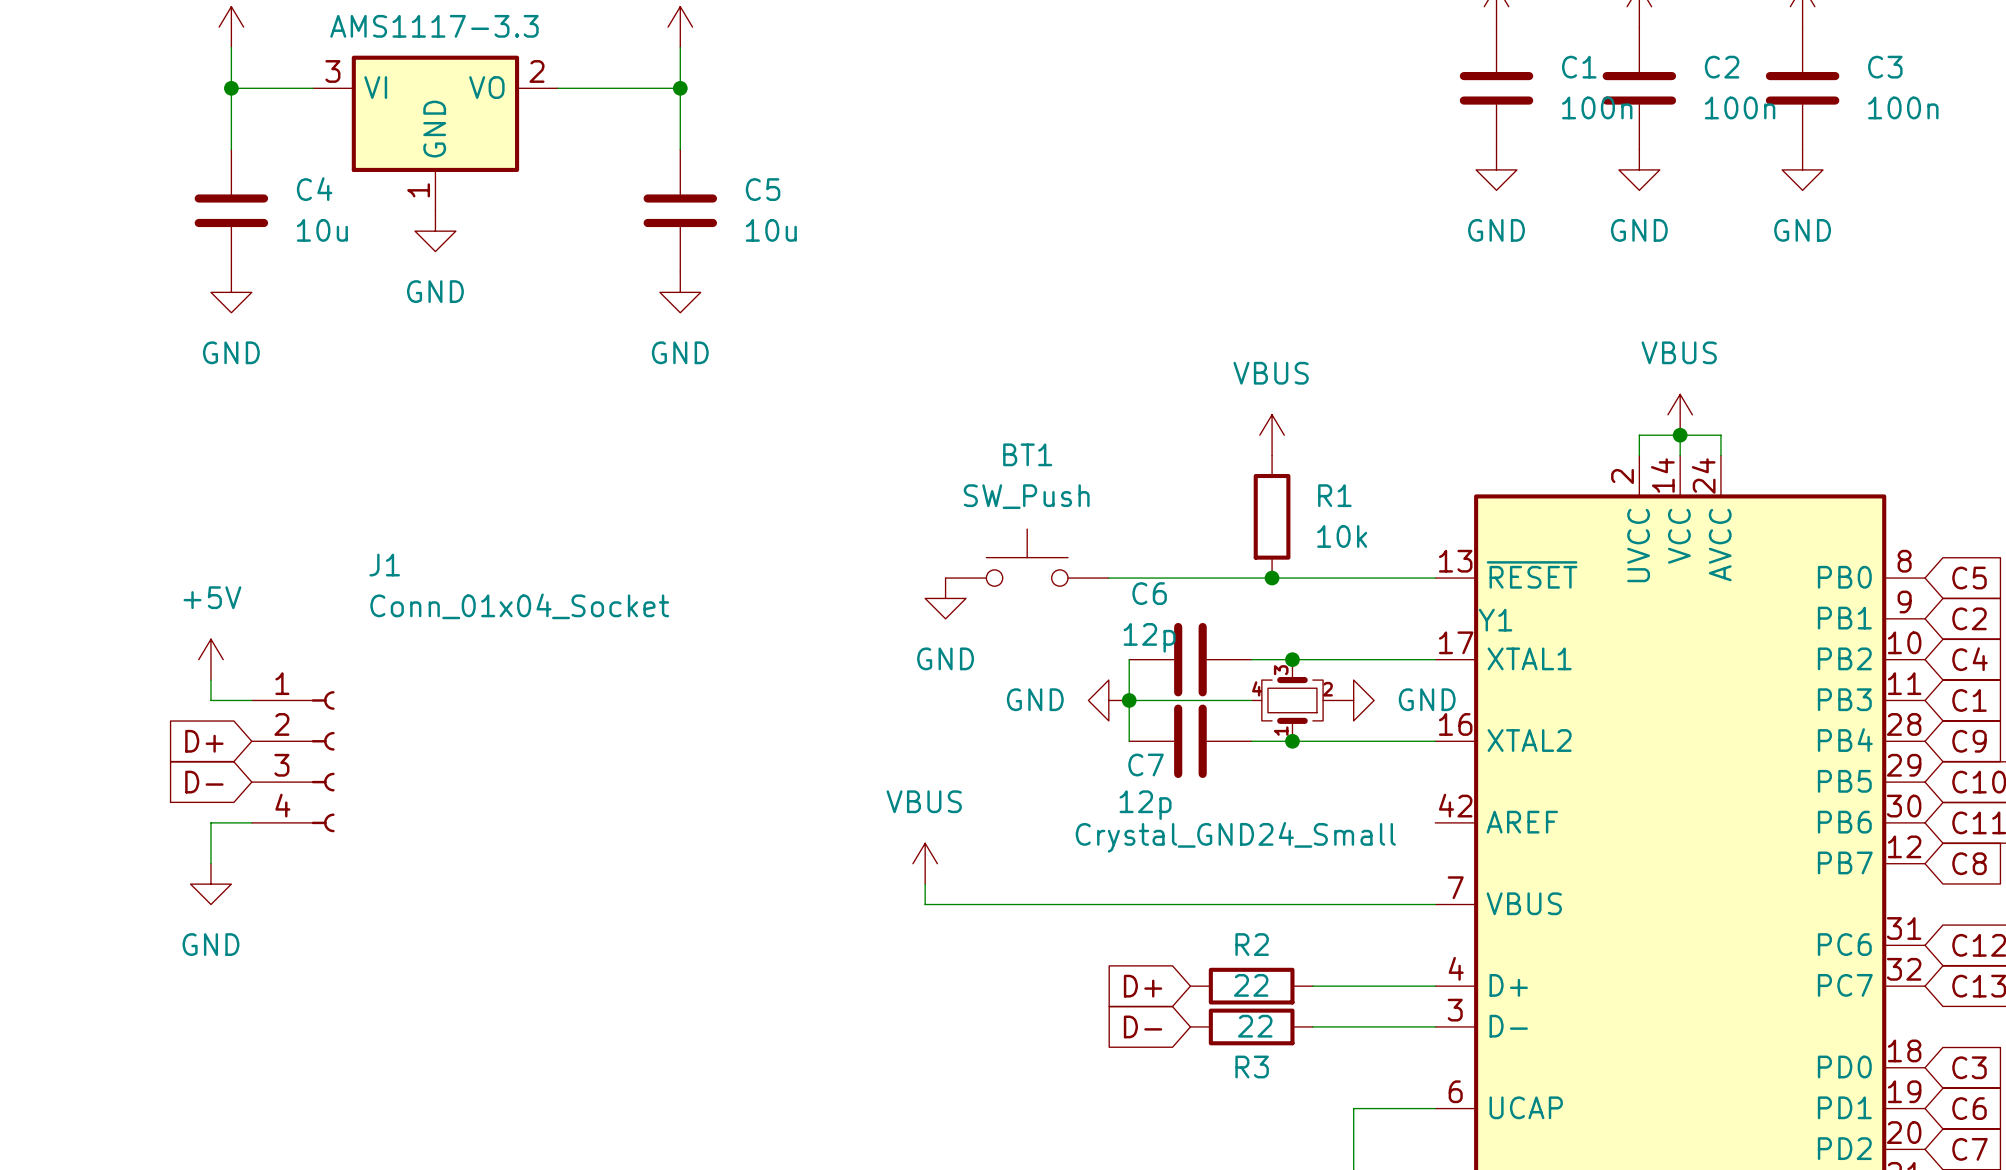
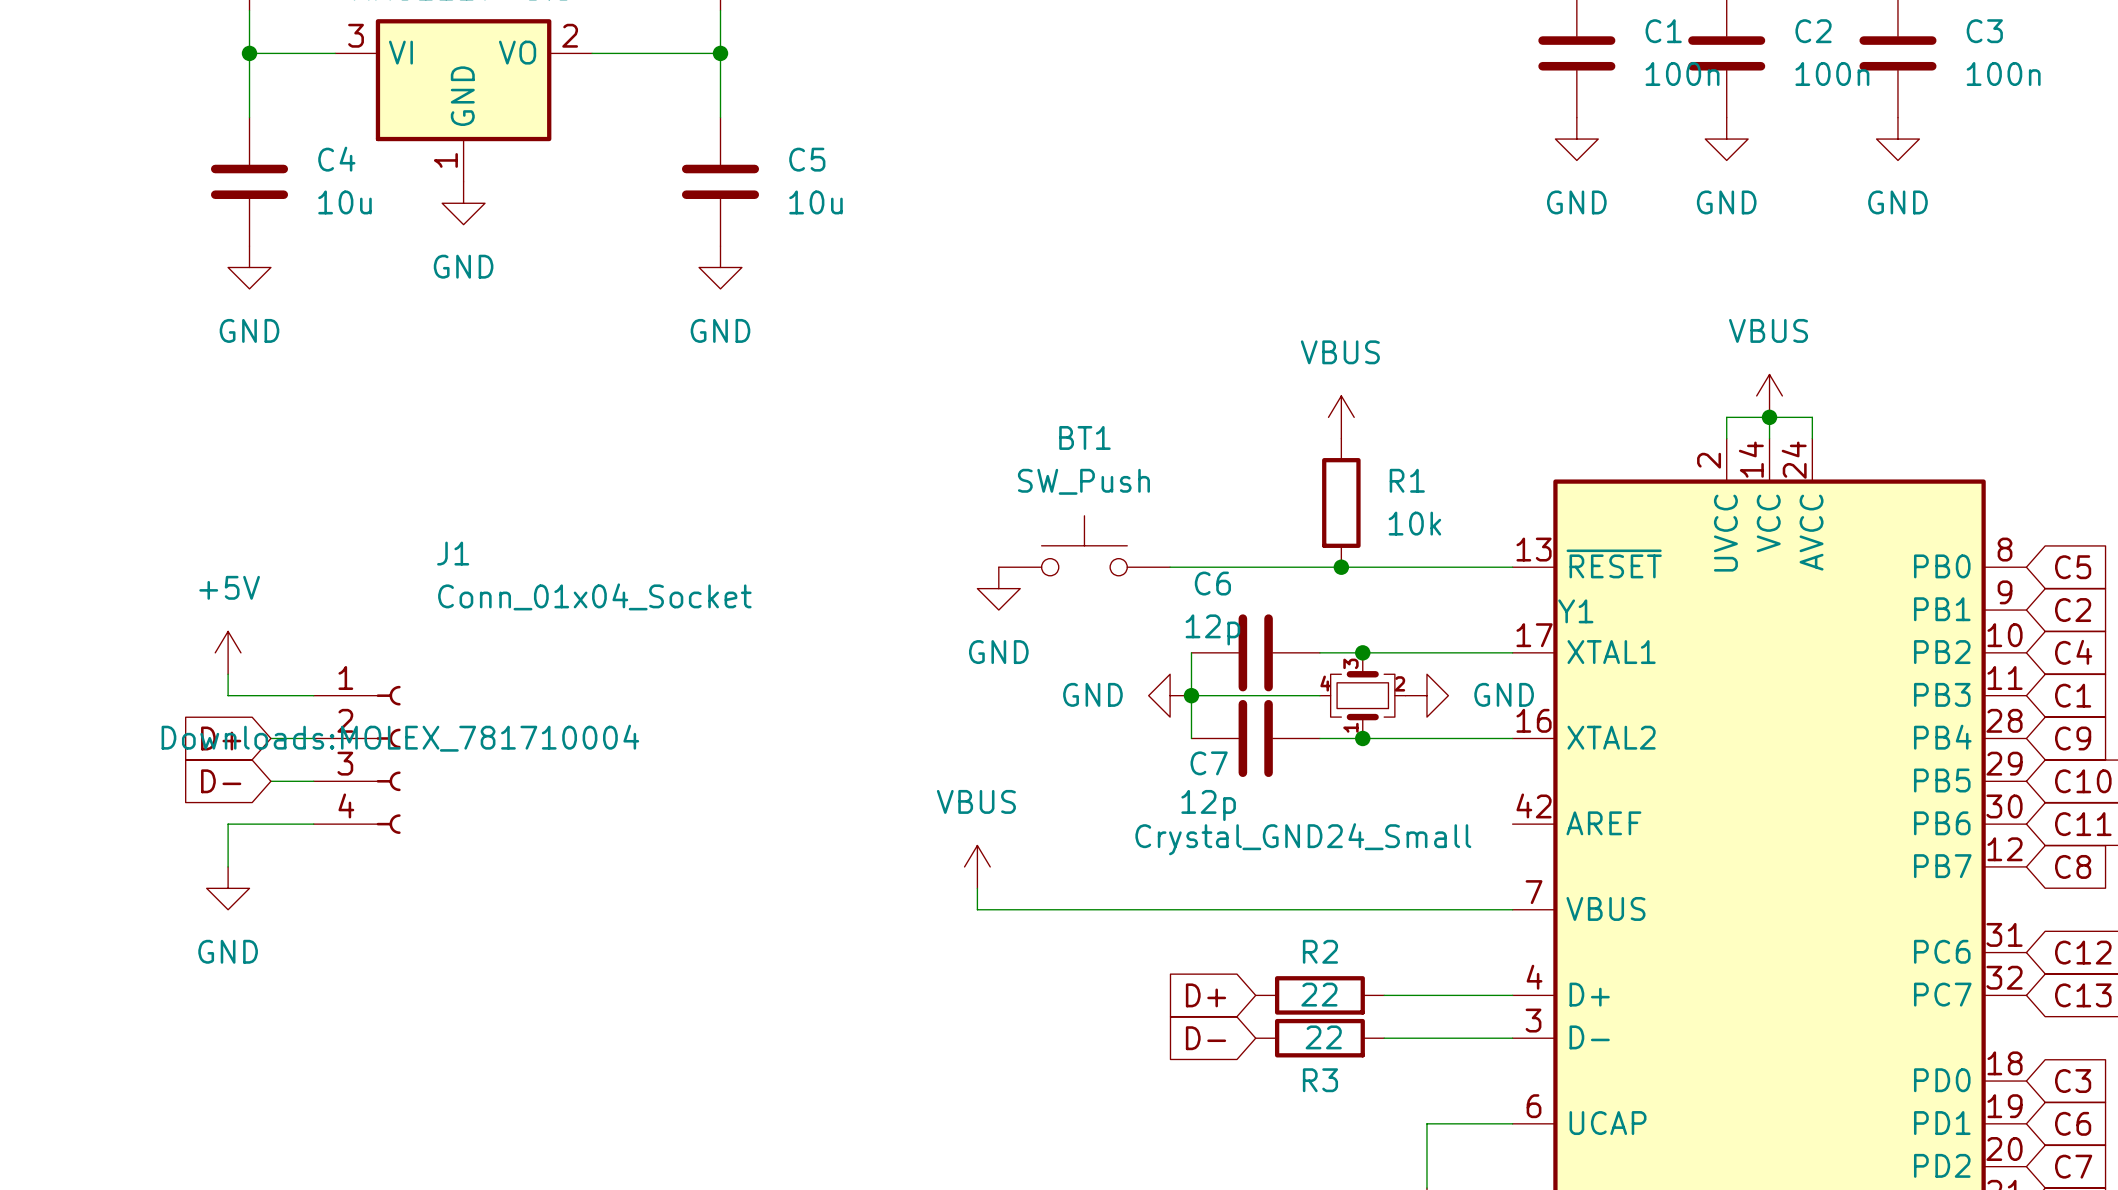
J1 text: none -> Downloads:MOLEX_781710004 (400, 738)
J1 position: (293, 761) -> (357, 759)

